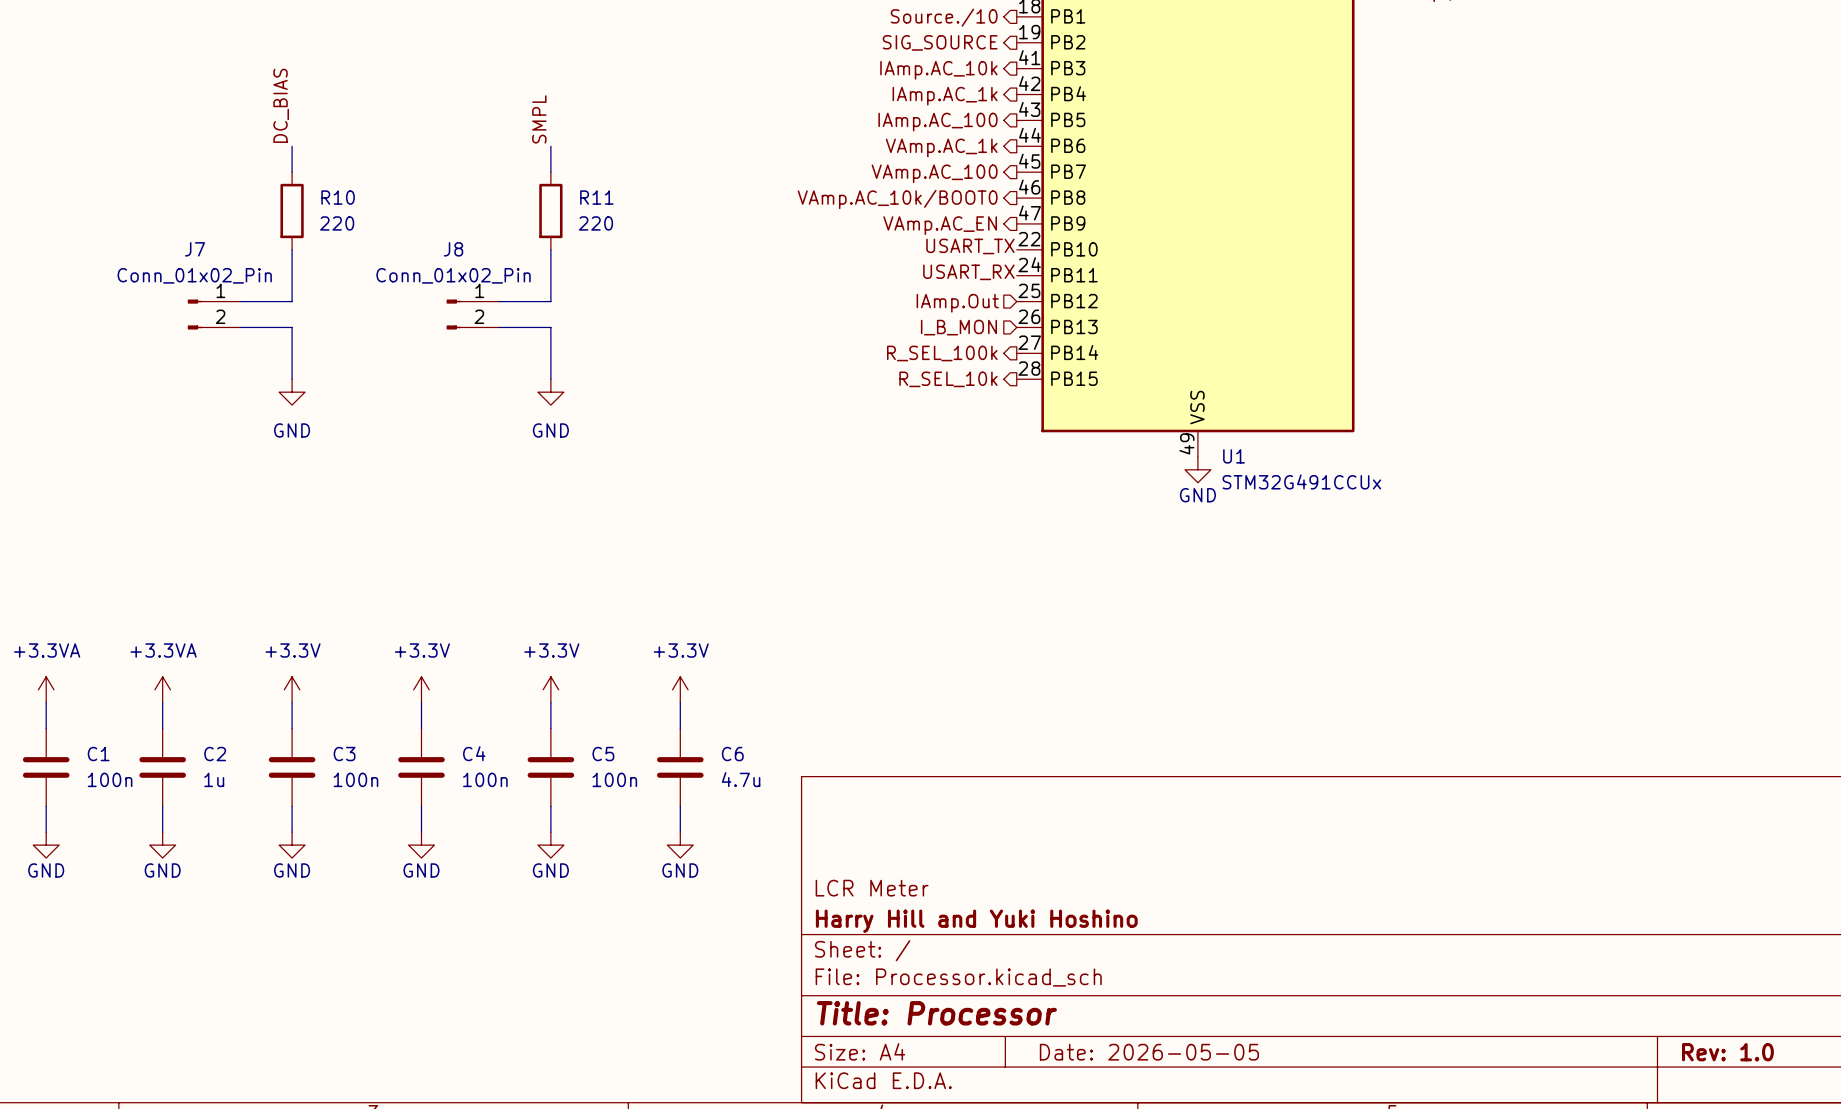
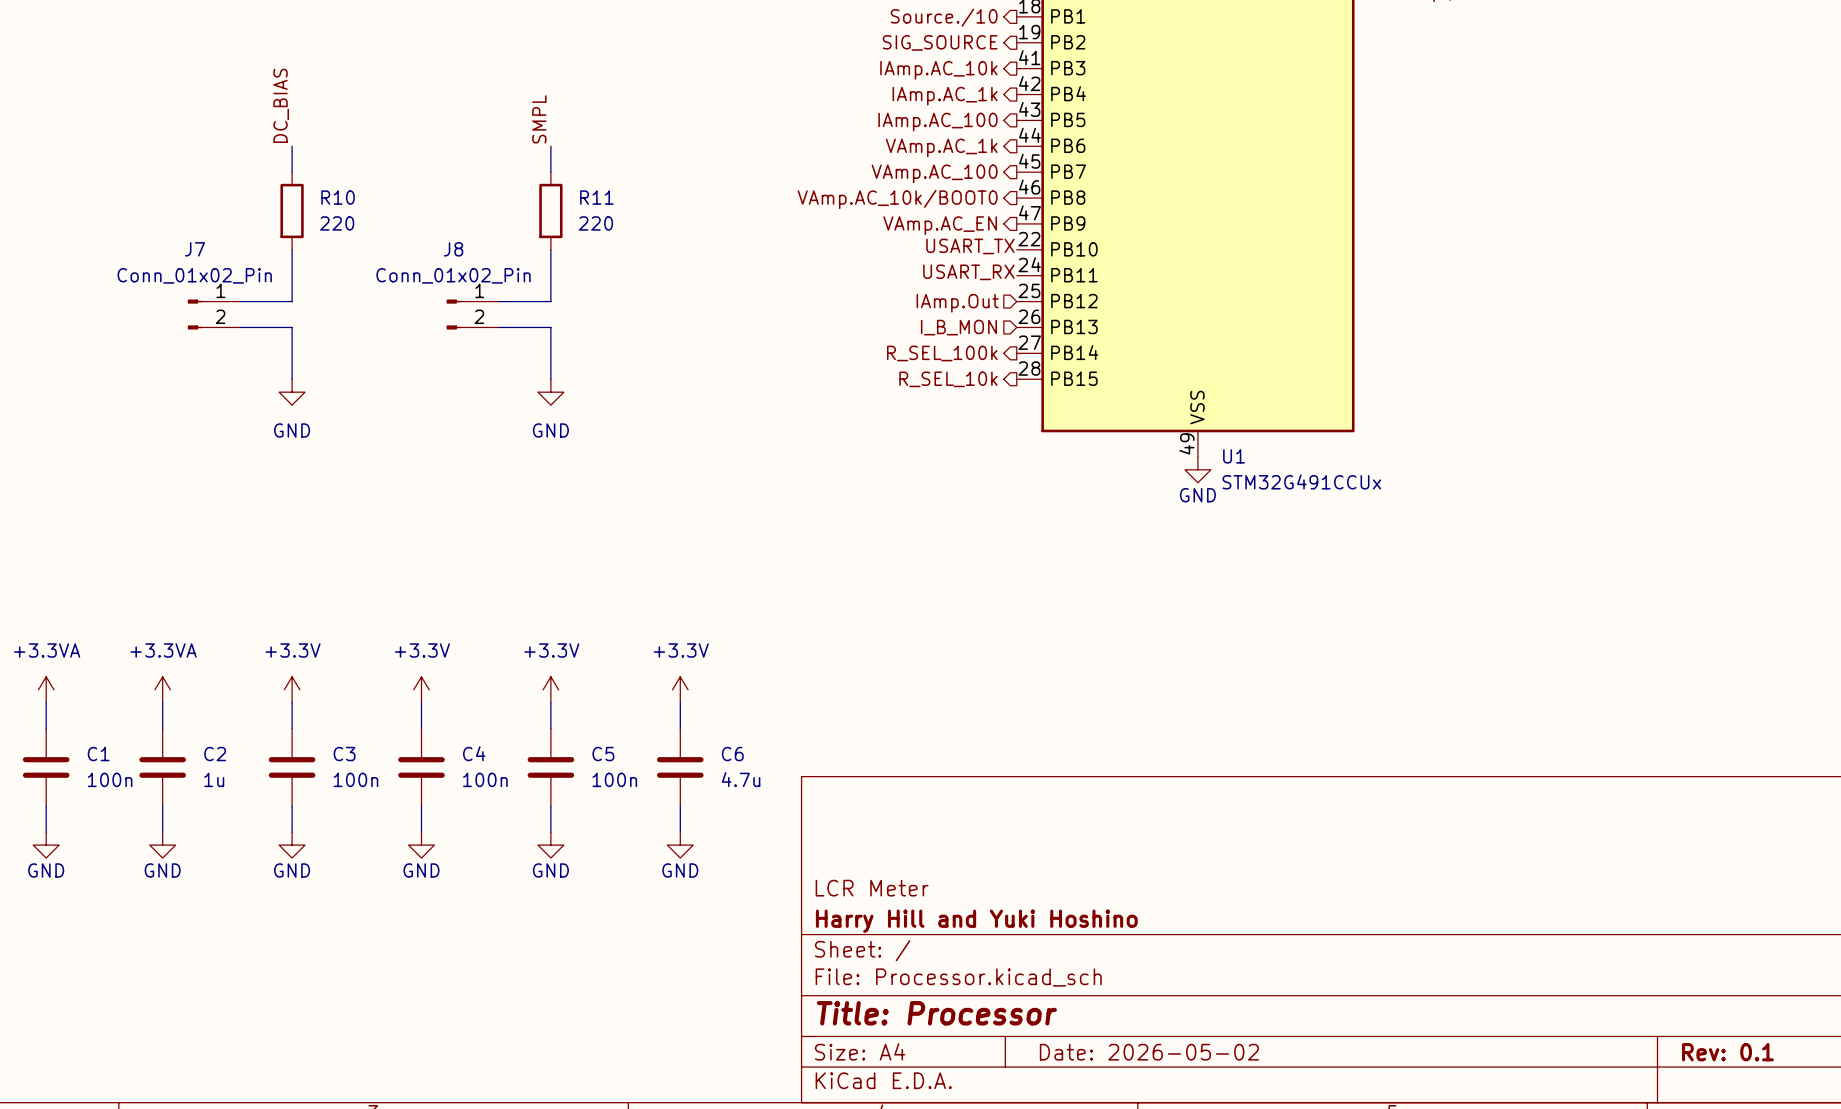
title block: Date: 2026-05-05 (1149, 1052) -> Date: 2026-05-02 (1149, 1052)
title block: Rev: 1.0 (1727, 1052) -> Rev: 0.1 (1727, 1052)

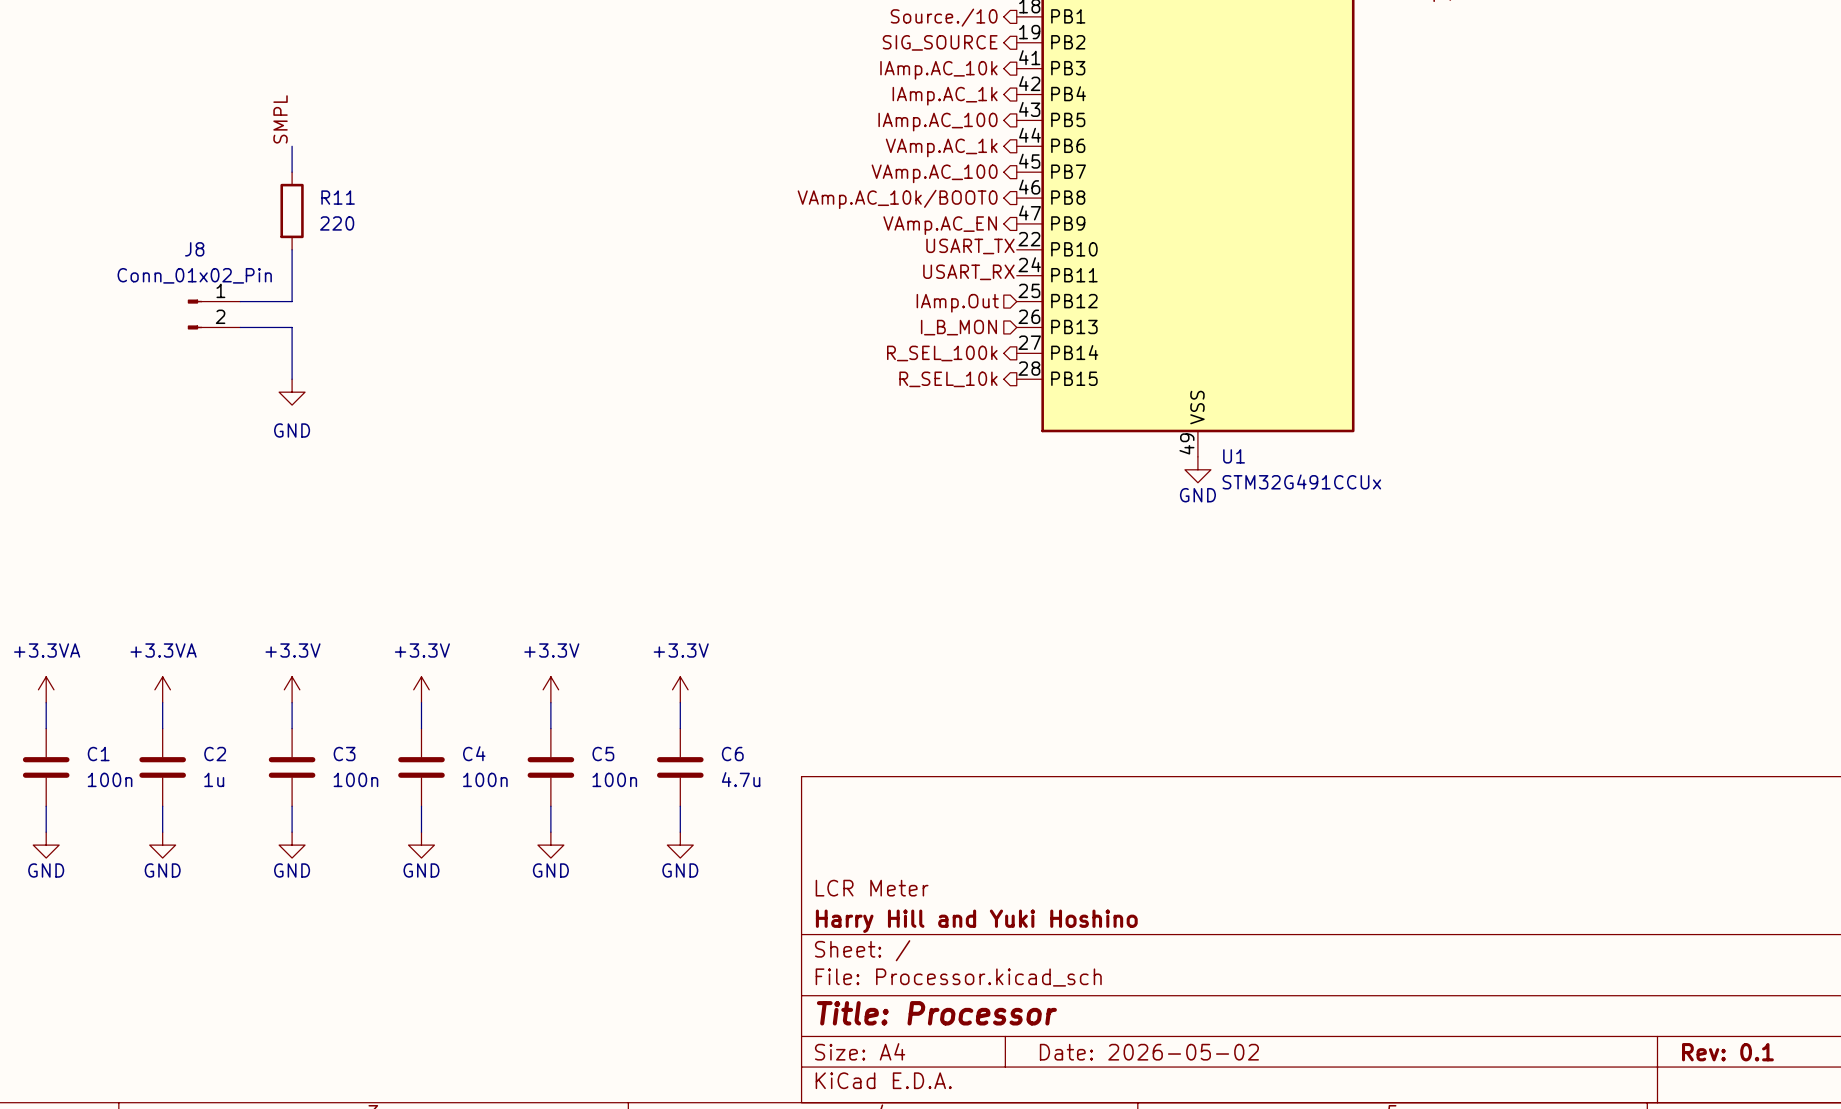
label: DC_BIAS (281, 105) -> SMPL (280, 119)
label: SMPL (539, 119) -> none
wire: (550, 146) (550, 172) -> none
R10 name: R10 (338, 197) -> R11 (338, 197)
R11: 220 (550, 211) -> none
J7 name: J7 (195, 249) -> J8 (194, 249)
wire: (550, 249) (550, 301) (499, 301) -> none
J8: Conn_01x02_Pin (472, 314) -> none
wire: (499, 327) (550, 327) (550, 379) -> none
power symbol: GND (550, 392) -> none

